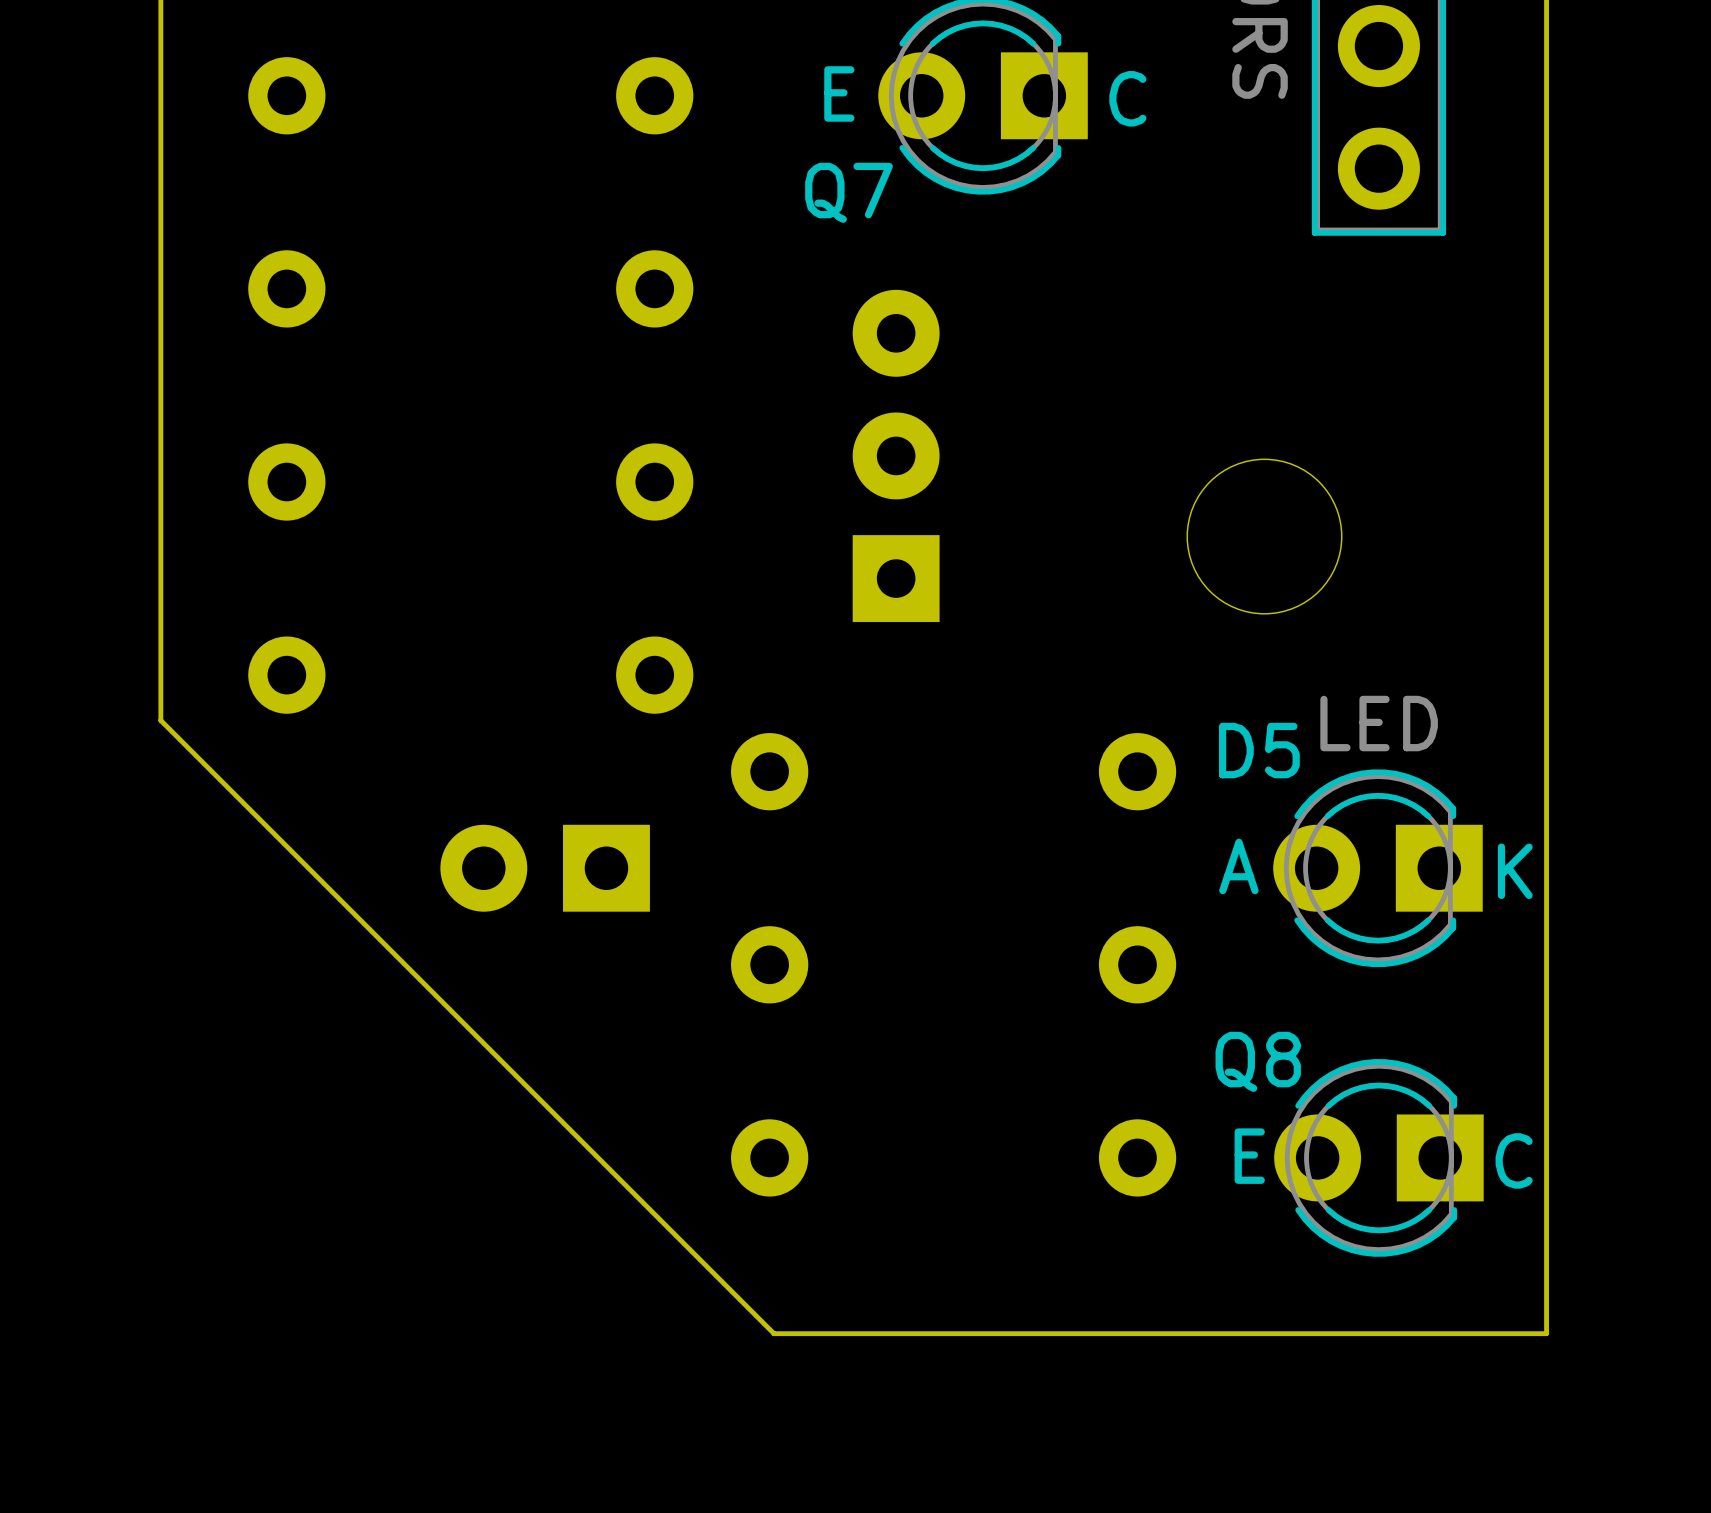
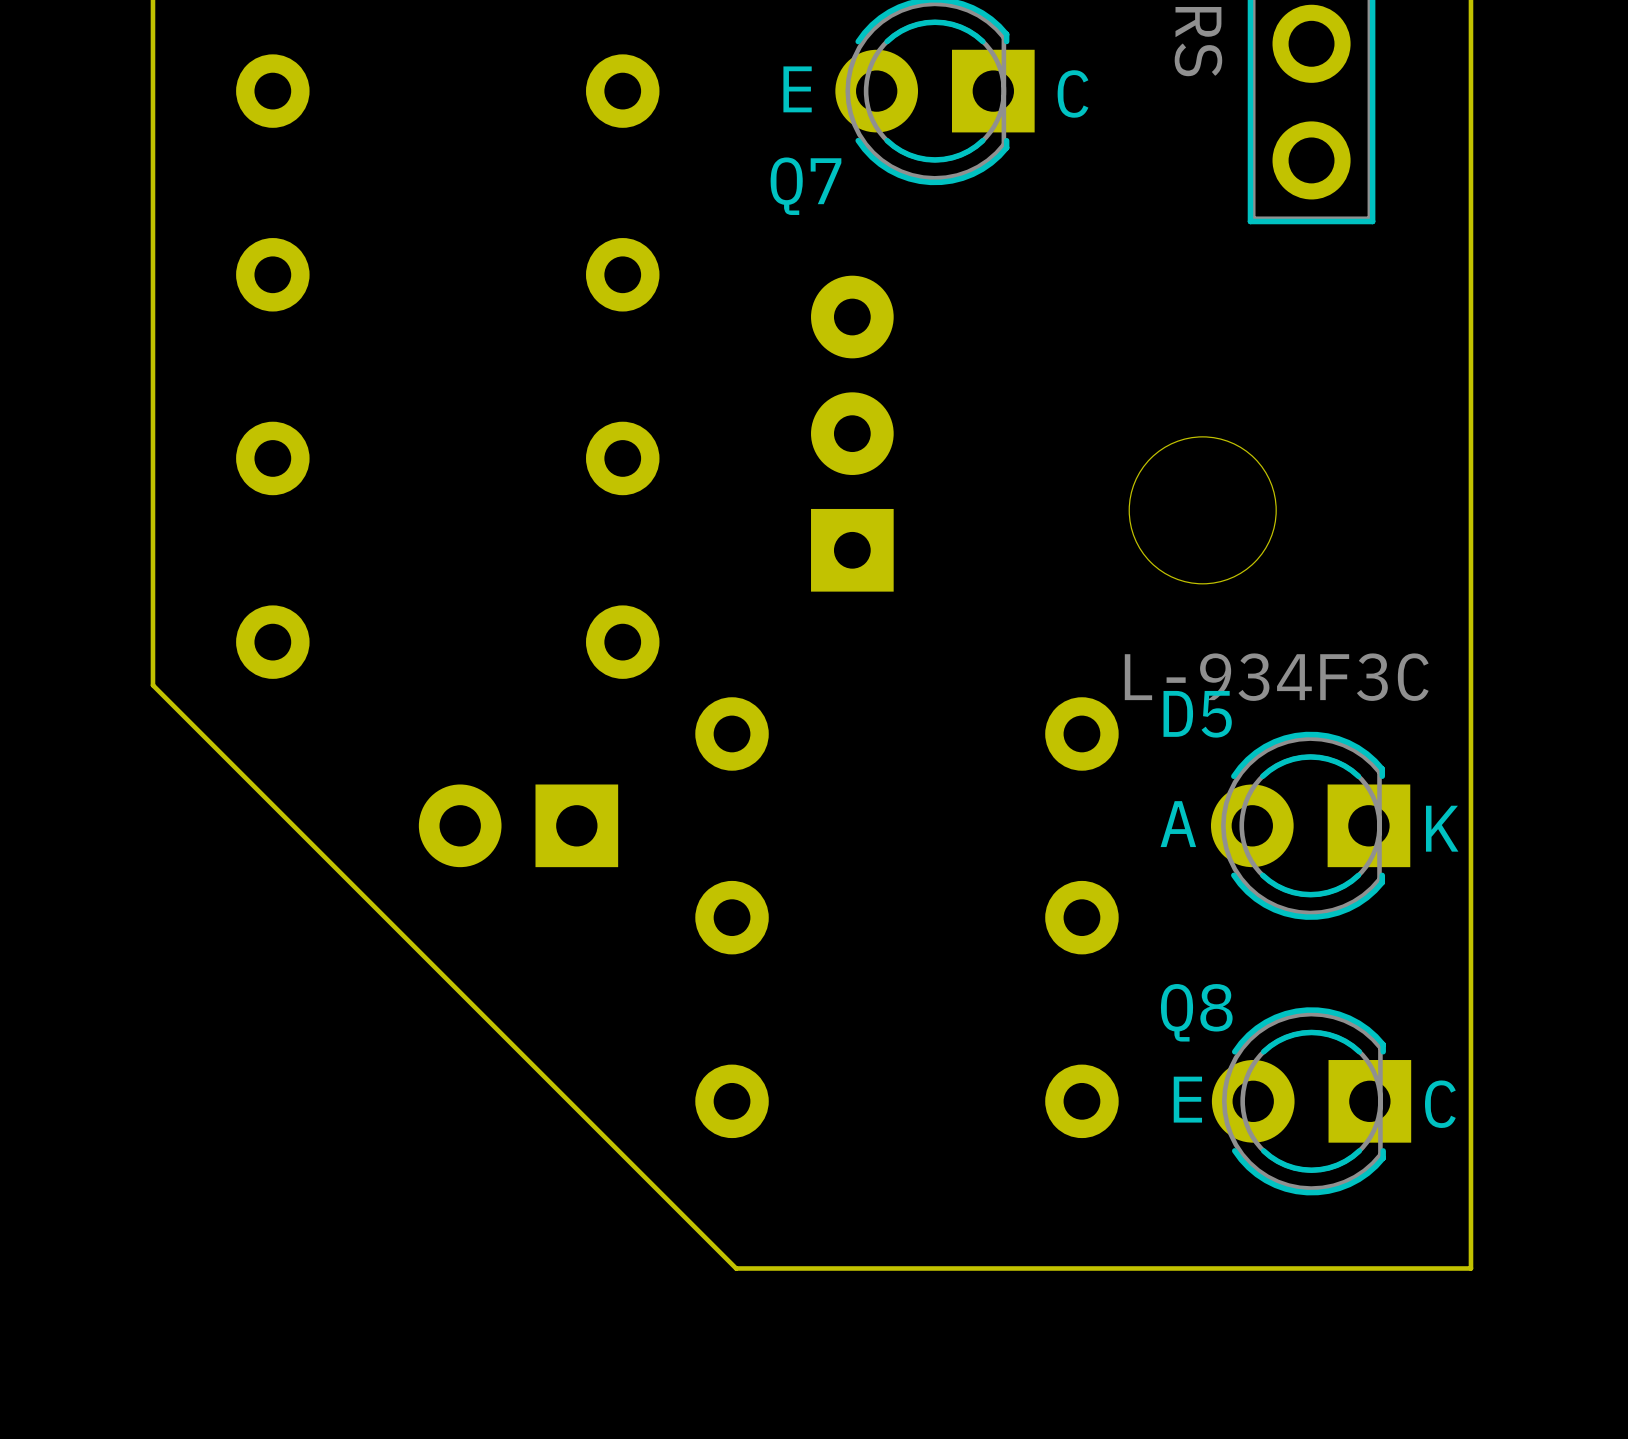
D5 value: LED (1379, 723) -> L-934F3C (1276, 677)

